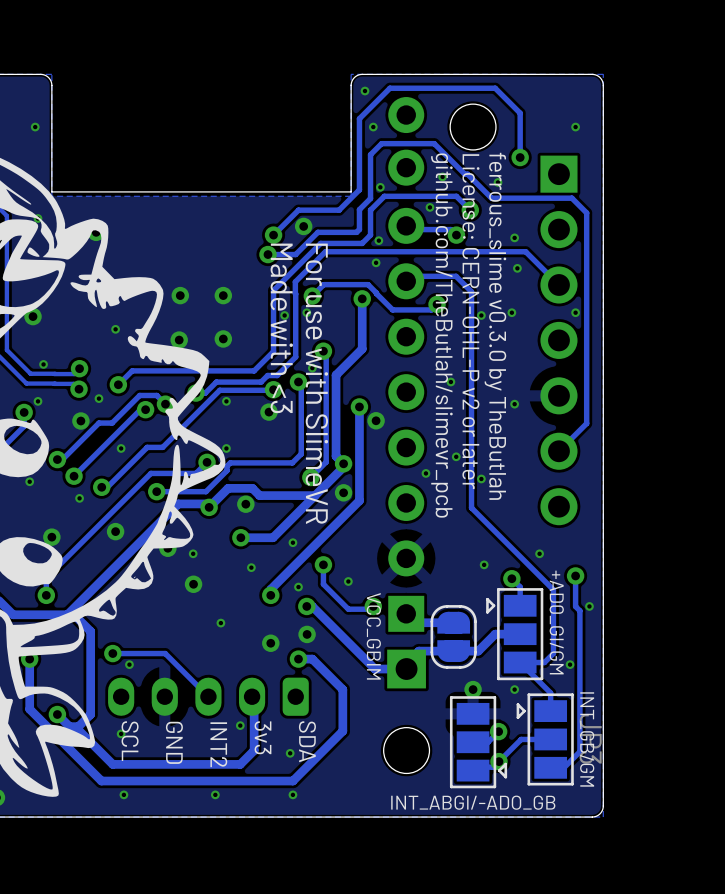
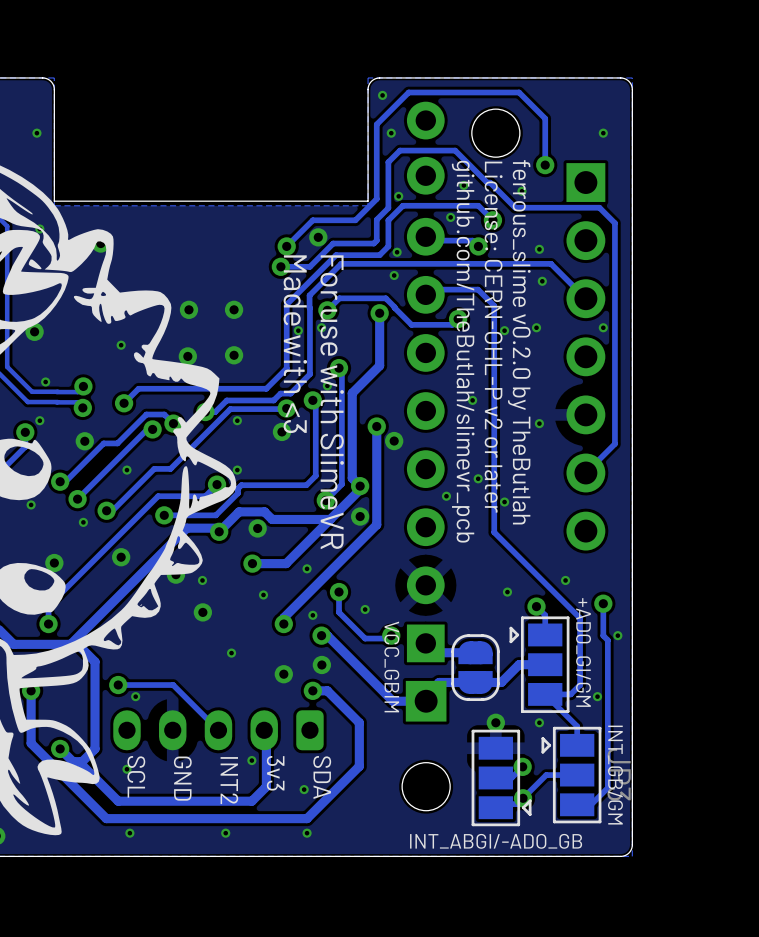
text: ferrous_slime v0.3.0 by TheButlah (495, 326) -> ferrous_slime v0.2.0 by TheButlah (519, 342)
via: (98, 398) -> none

